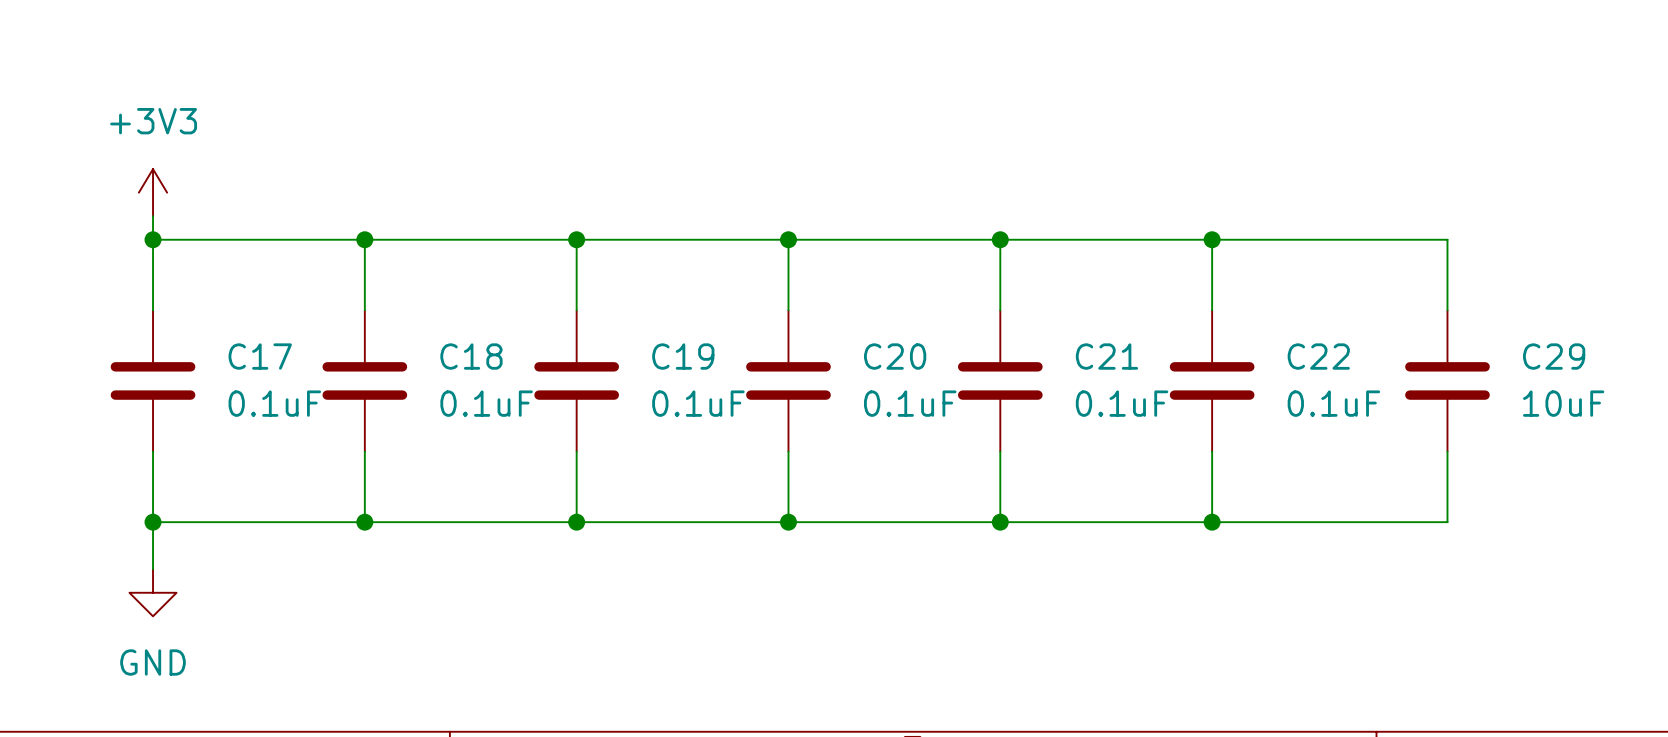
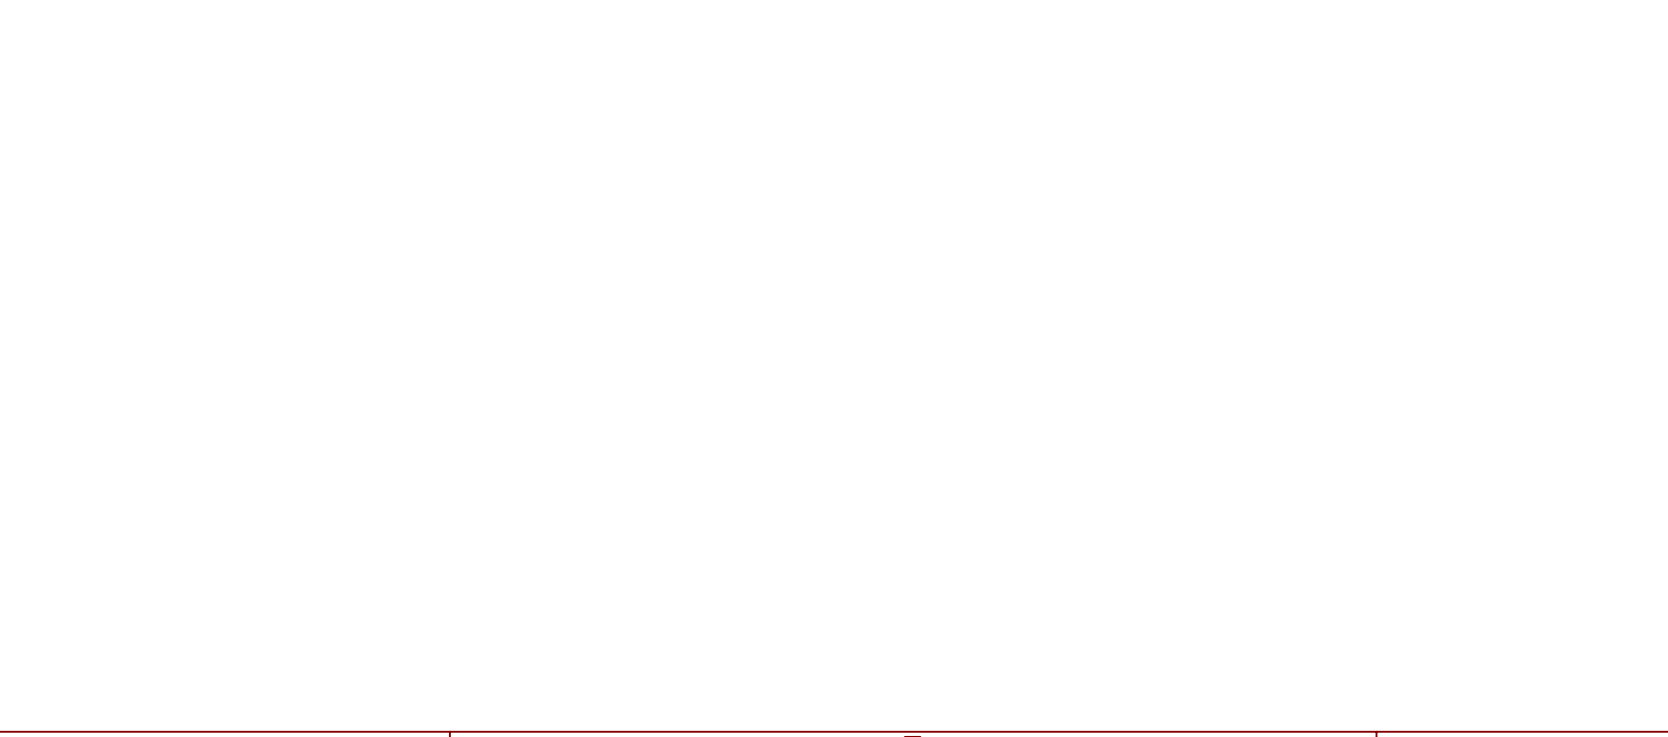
power symbol: +3V3 (153, 192) -> none
wire: (153, 216) (153, 310) -> none
wire: (153, 239) (1447, 239) (1447, 310) -> none
junction: (153, 239) -> none
wire: (364, 239) (364, 310) -> none
junction: (364, 239) -> none
wire: (576, 239) (576, 310) -> none
junction: (576, 239) -> none
wire: (788, 239) (788, 310) -> none
junction: (788, 239) -> none
wire: (1000, 239) (1000, 310) -> none
junction: (1000, 239) -> none
wire: (1212, 239) (1212, 310) -> none
junction: (1212, 239) -> none
C17: 0.1uF (153, 380) -> none
C18: 0.1uF (364, 380) -> none
C19: 0.1uF (576, 380) -> none
C20: 0.1uF (788, 380) -> none
C21: 0.1uF (1000, 380) -> none
C22: 0.1uF (1212, 380) -> none
C29: 10uF (1447, 380) -> none
wire: (153, 451) (153, 569) -> none
wire: (364, 451) (364, 522) -> none
wire: (576, 451) (576, 522) -> none
wire: (788, 451) (788, 522) -> none
wire: (1000, 451) (1000, 522) -> none
wire: (1212, 451) (1212, 522) -> none
wire: (1447, 451) (1447, 522) (153, 522) -> none
junction: (153, 522) -> none
junction: (364, 522) -> none
junction: (576, 522) -> none
junction: (788, 522) -> none
junction: (1000, 522) -> none
junction: (1212, 522) -> none
power symbol: GND (153, 592) -> none

